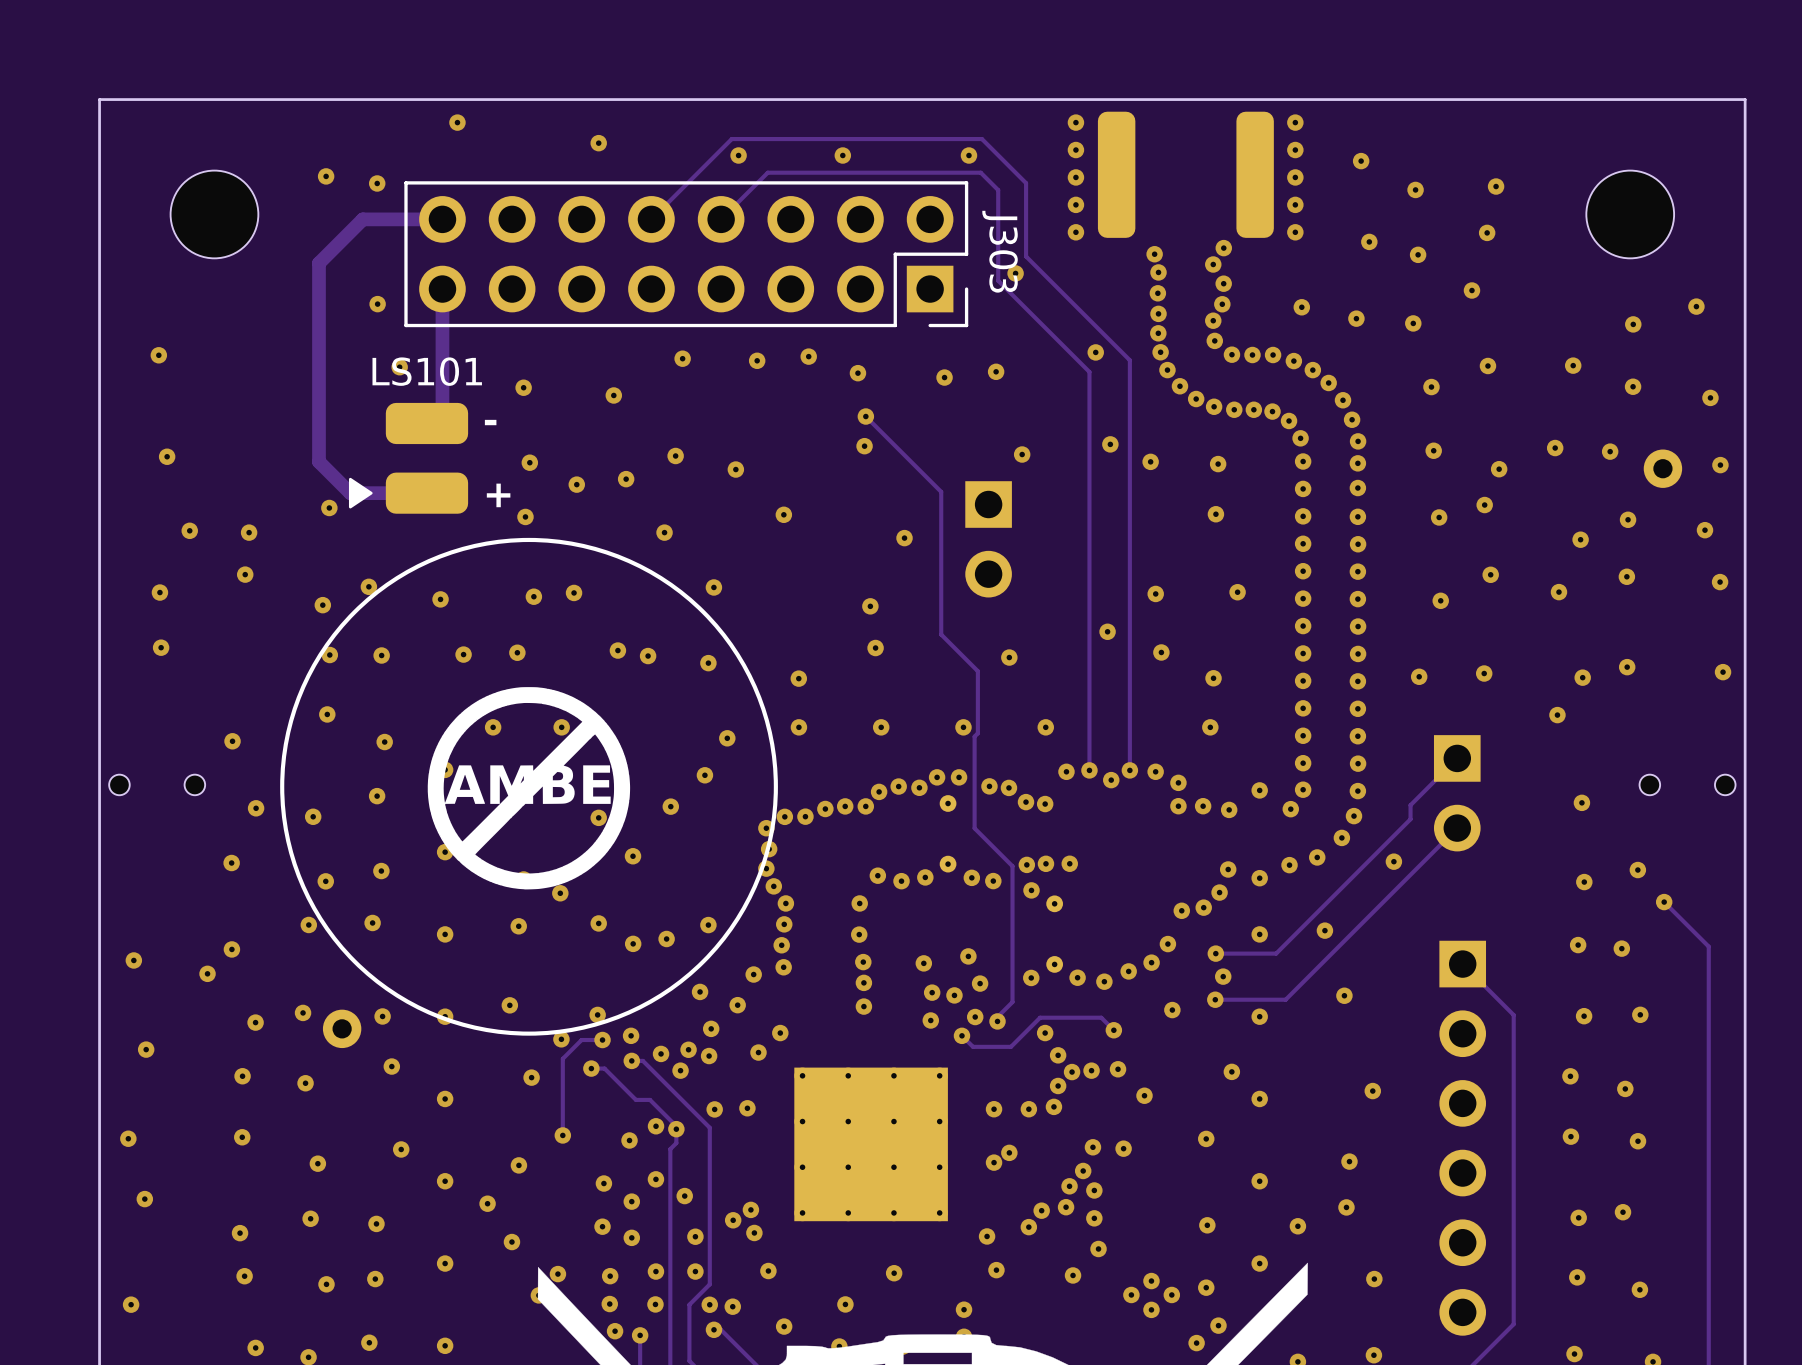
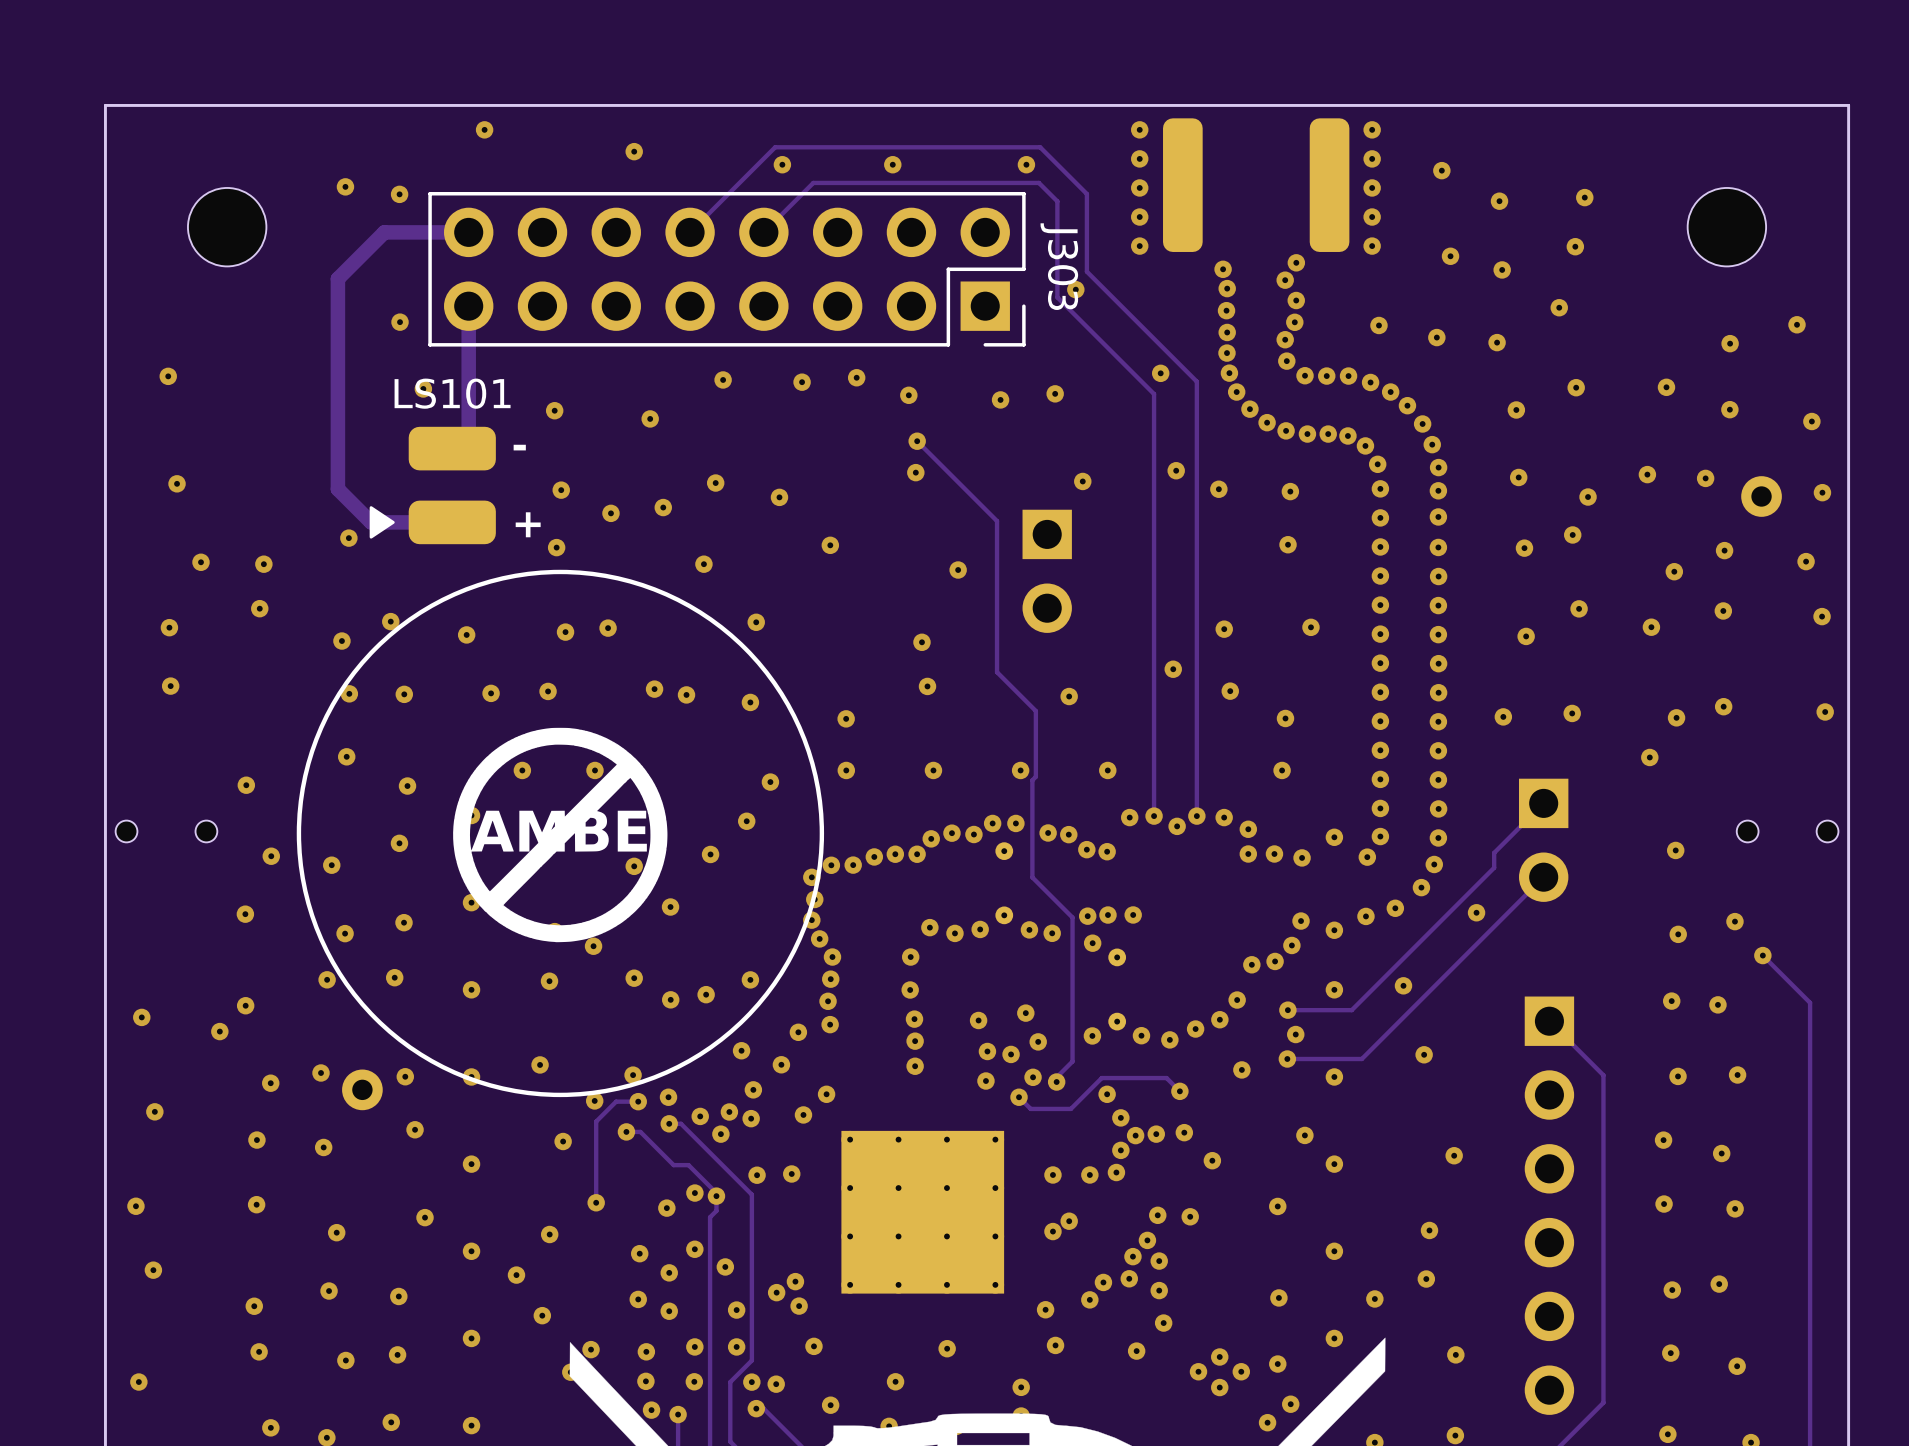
part footprint: [170, 170, 259, 259] -> [187, 187, 267, 267]
part footprint: [1586, 170, 1675, 259] -> [1687, 187, 1767, 267]

